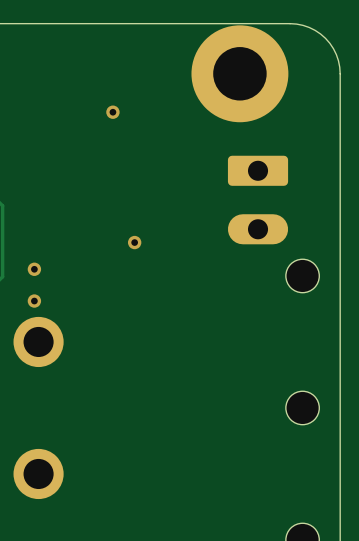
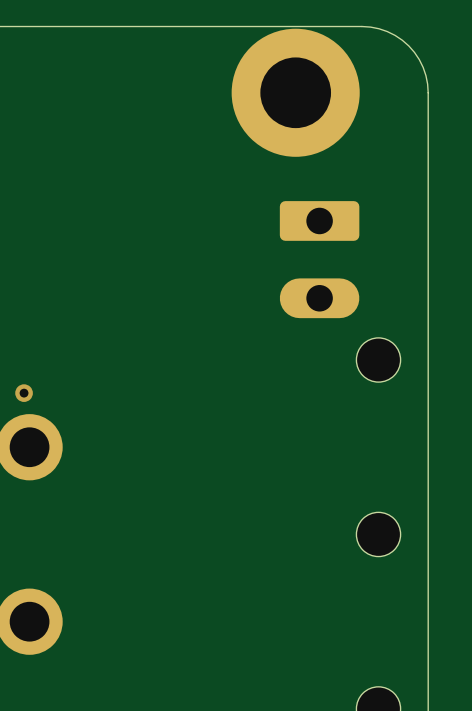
via: (112, 112) -> none
via: (134, 242) -> none
via: (34, 269) -> none

